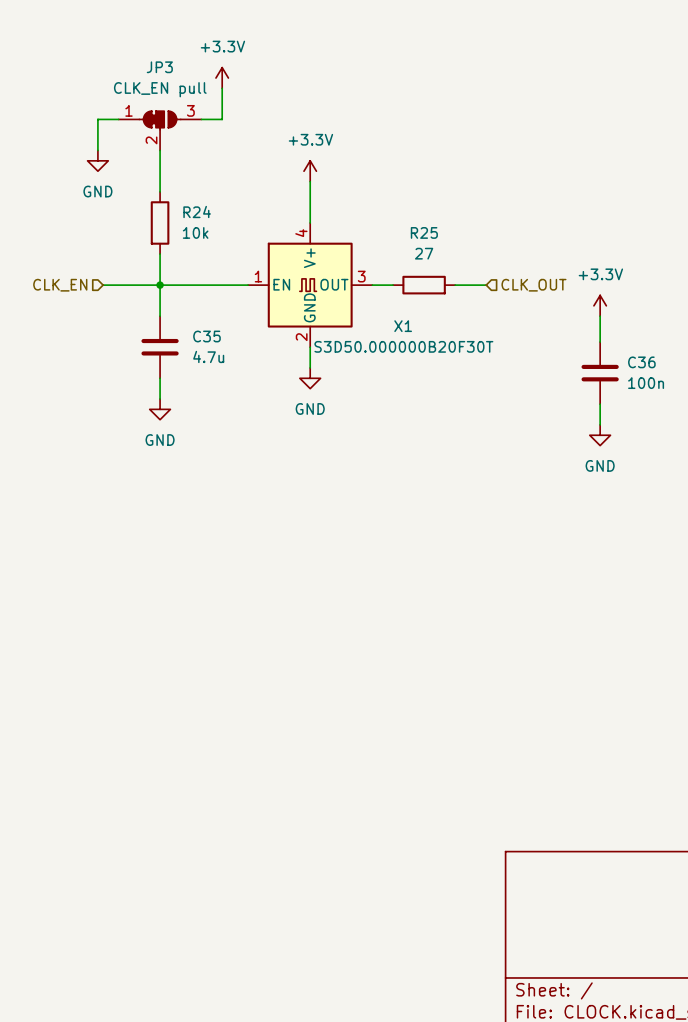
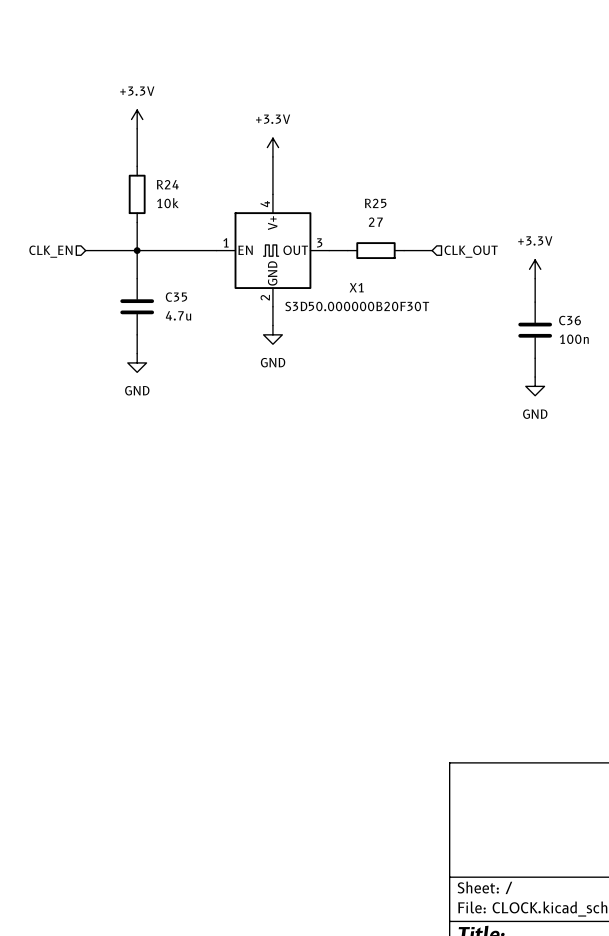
power symbol position: +3.3V (222, 78) -> +3.3V (137, 119)
wire: (222, 88) (222, 119) (201, 119) -> none
wire: (118, 119) (97, 119) (97, 150) -> none
JP3: CLK_EN pull (160, 130) -> none
power symbol: GND (97, 160) -> none

